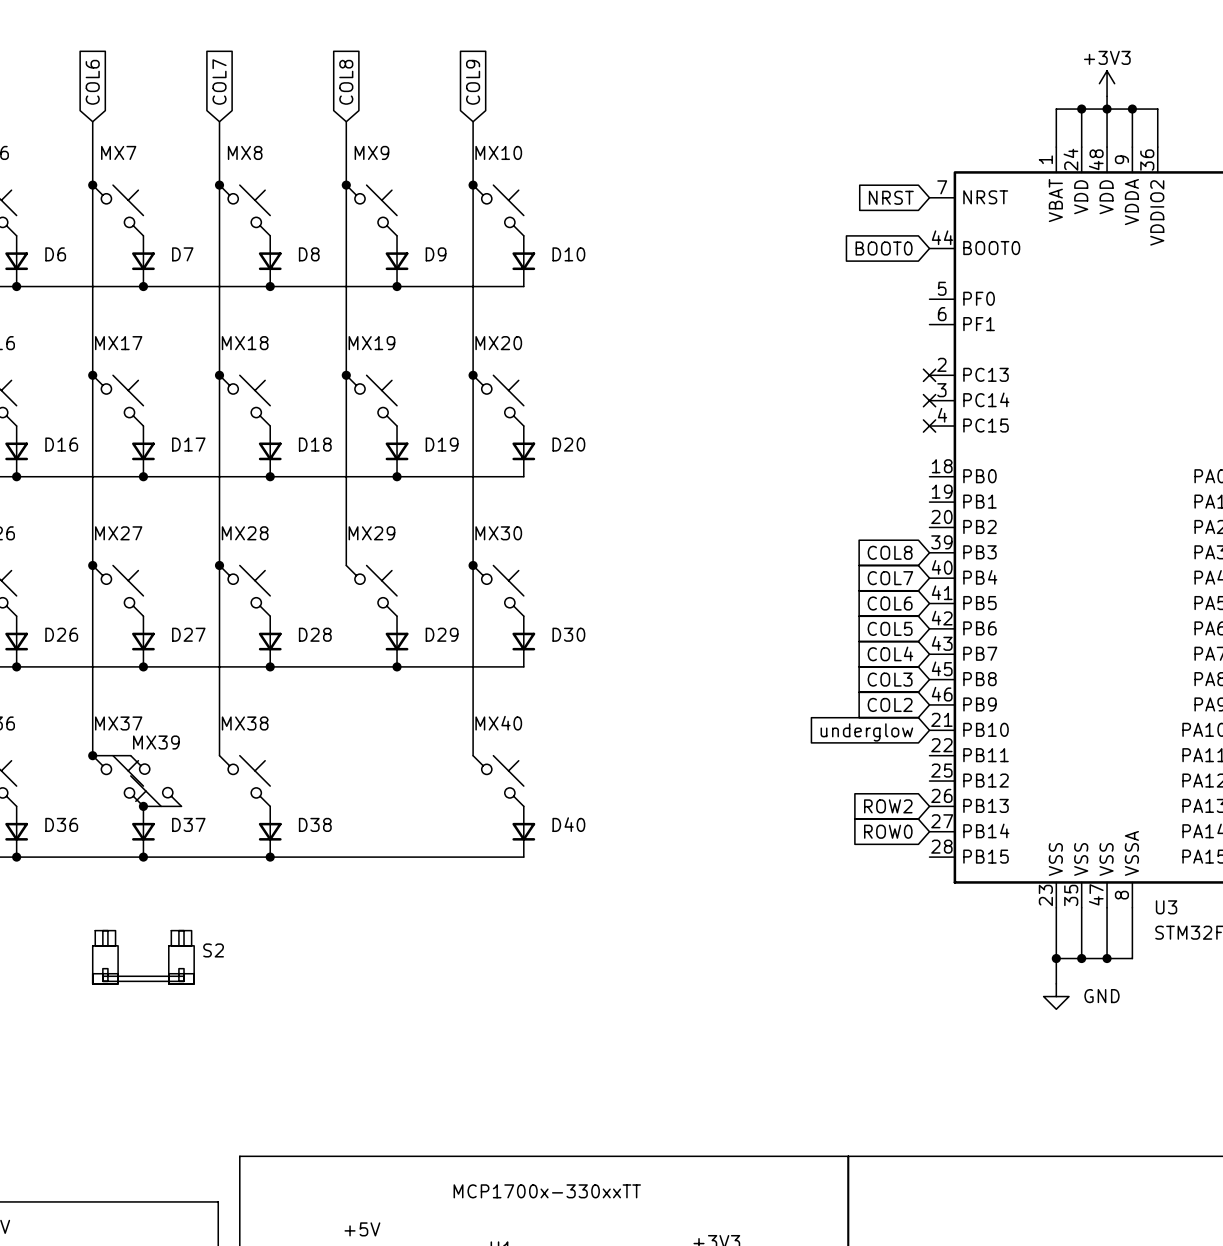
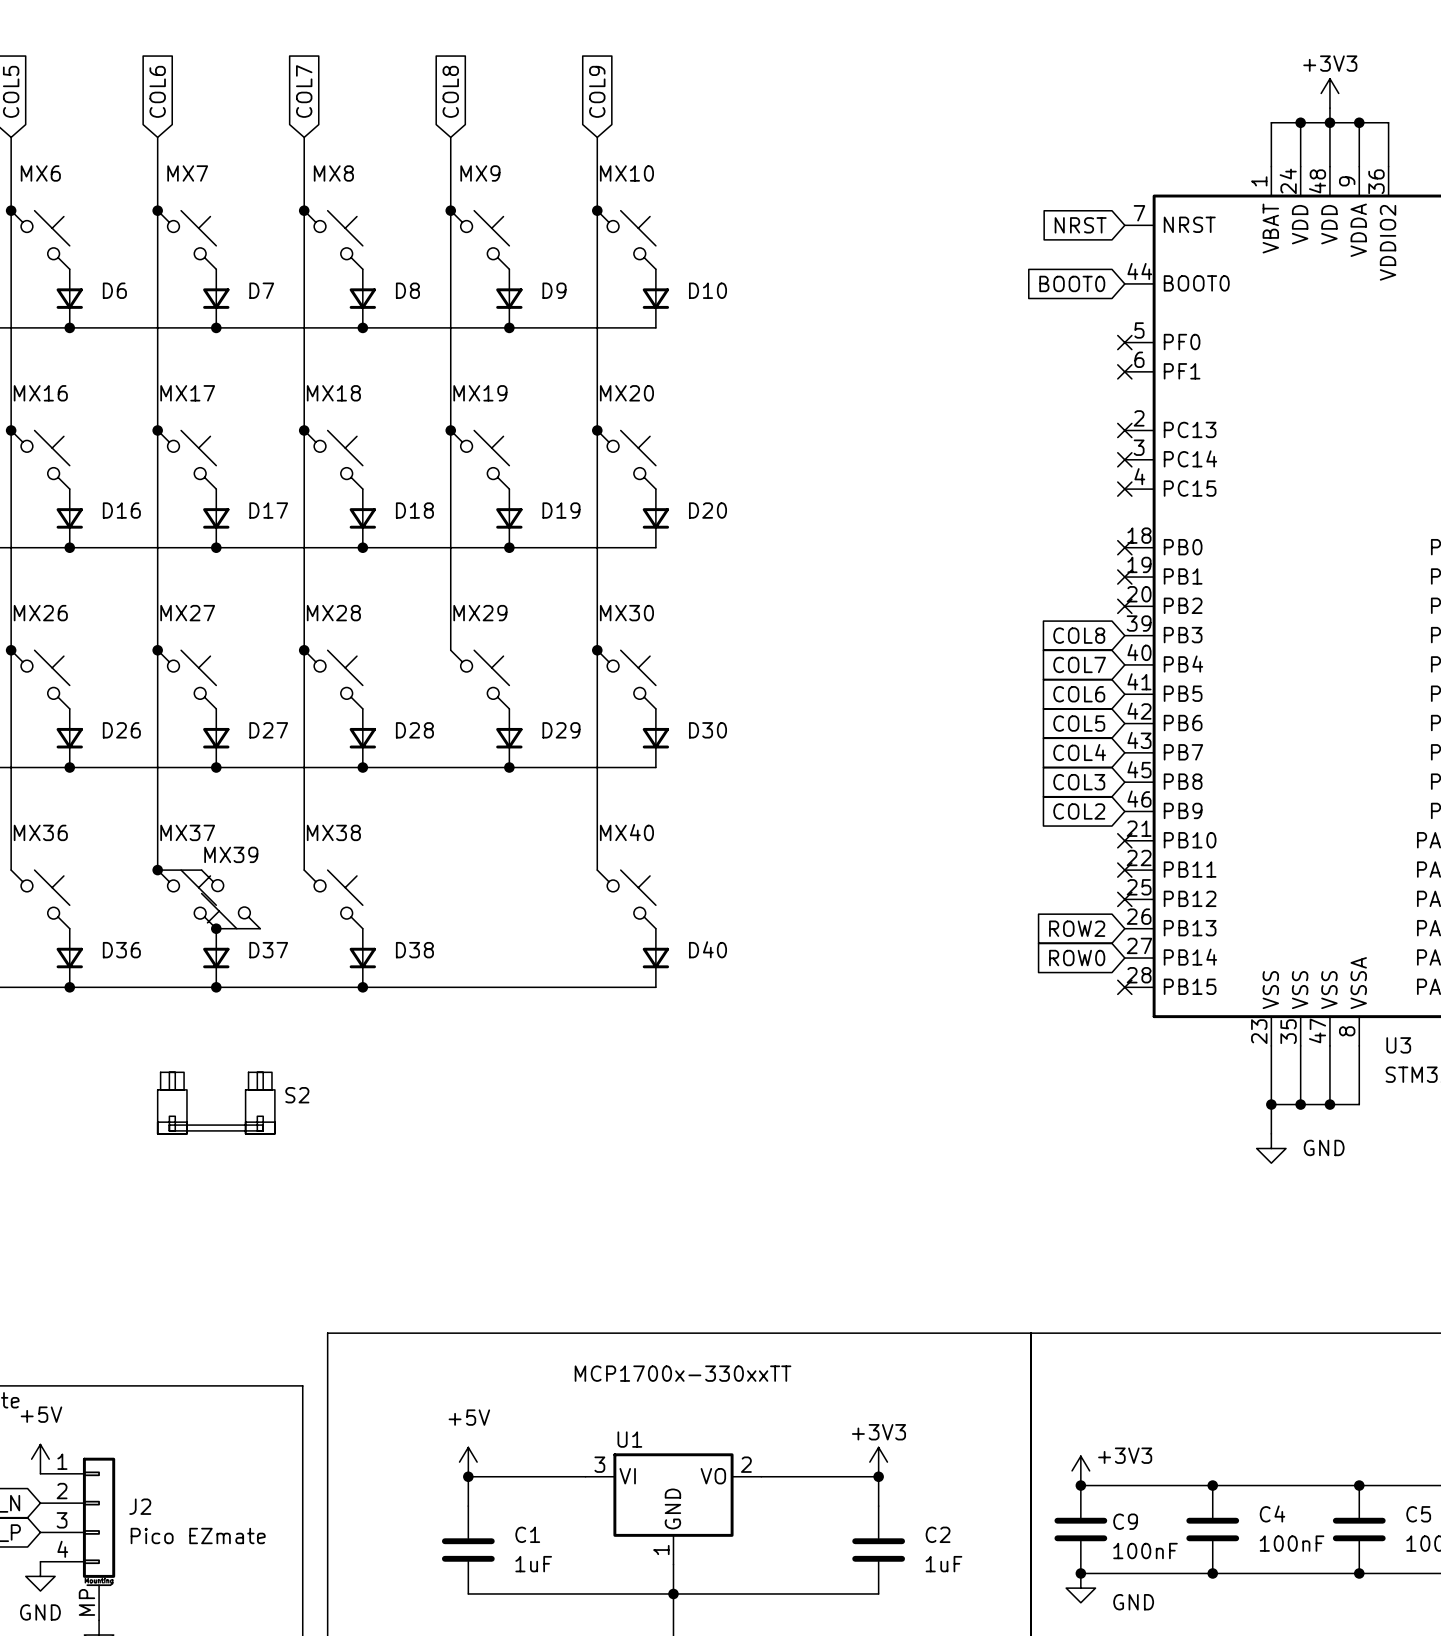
no-connect mark: none -> (1124, 342)
no-connect mark: none -> (1124, 371)
no-connect mark: none -> (1124, 547)
no-connect mark: none -> (1124, 577)
no-connect mark: none -> (1124, 606)
no-connect mark: none -> (1124, 840)
global label: underglow (866, 732) -> none
no-connect mark: none -> (1124, 870)
no-connect mark: none -> (1124, 899)
no-connect mark: none -> (1124, 987)

